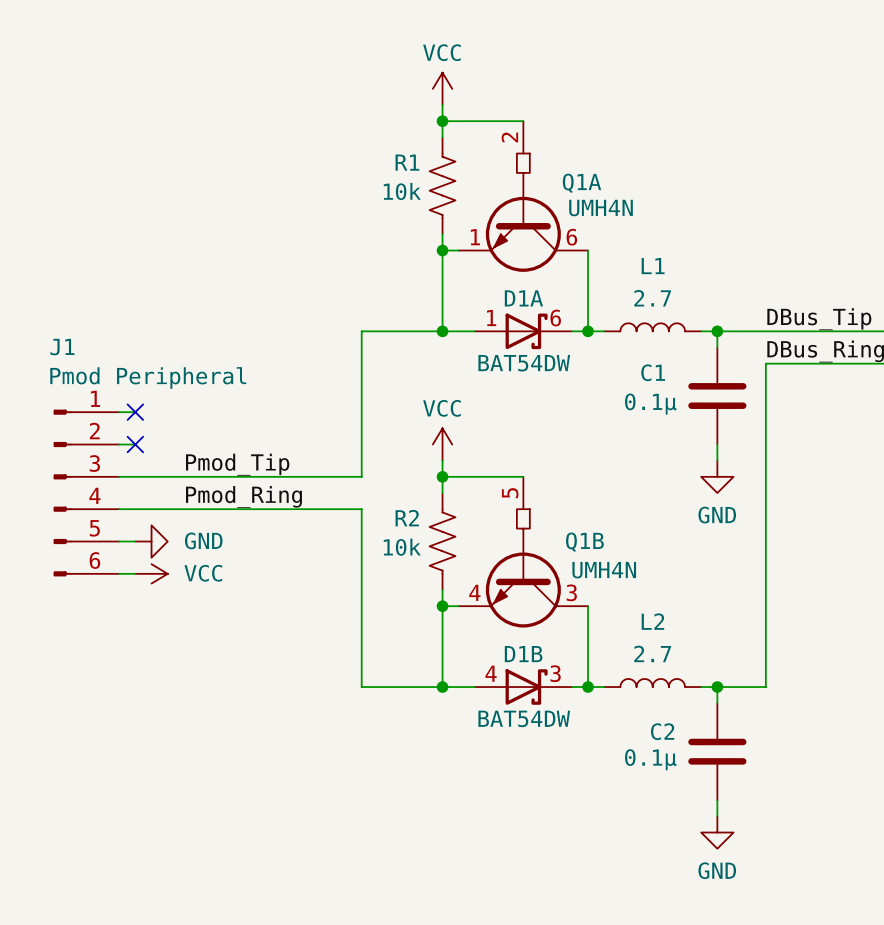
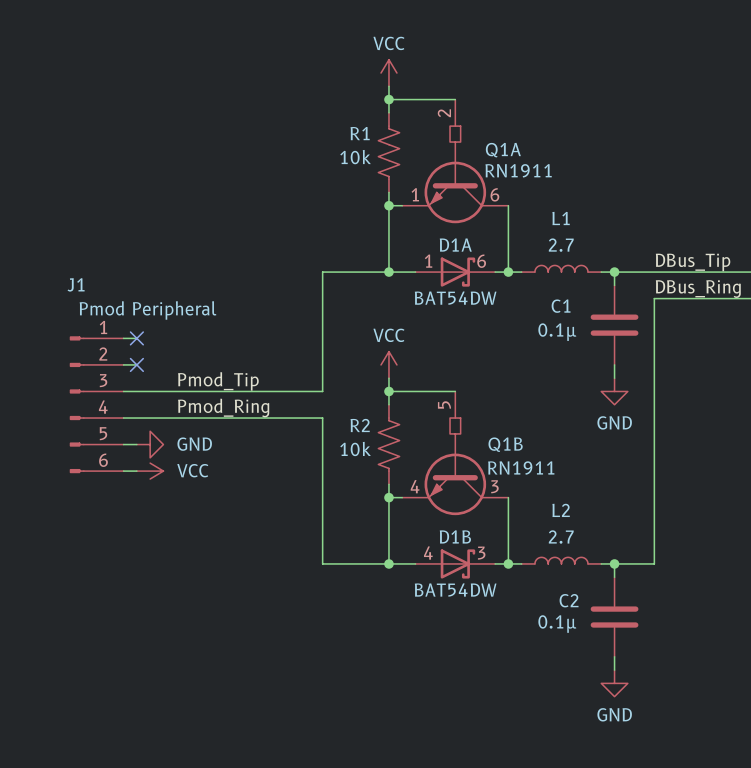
Q1A value: UMH4N (601, 208) -> RN1911 (518, 170)
Q1B value: UMH4N (604, 570) -> RN1911 (521, 468)

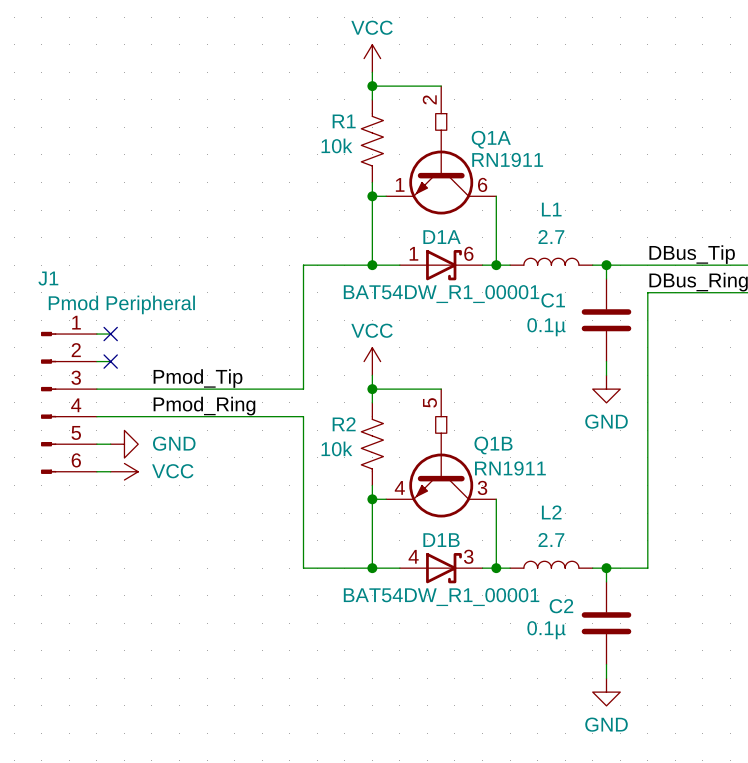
D1A value: BAT54DW (455, 298) -> BAT54DW_R1_00001 (441, 294)
D1B value: BAT54DW (455, 590) -> BAT54DW_R1_00001 (441, 597)

